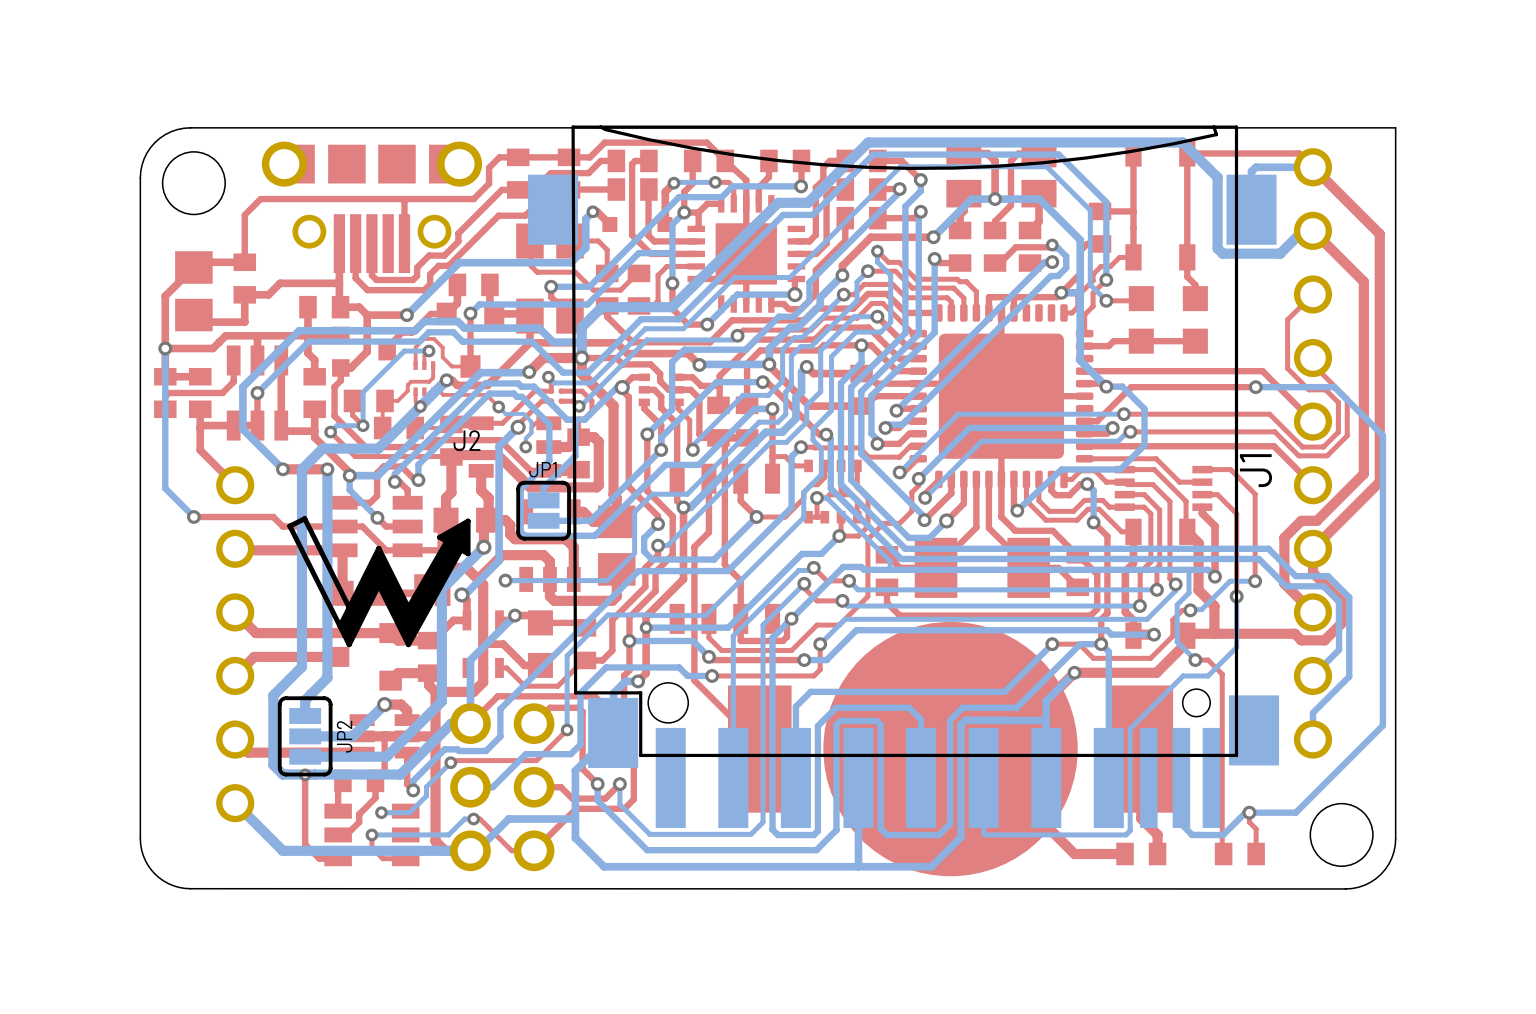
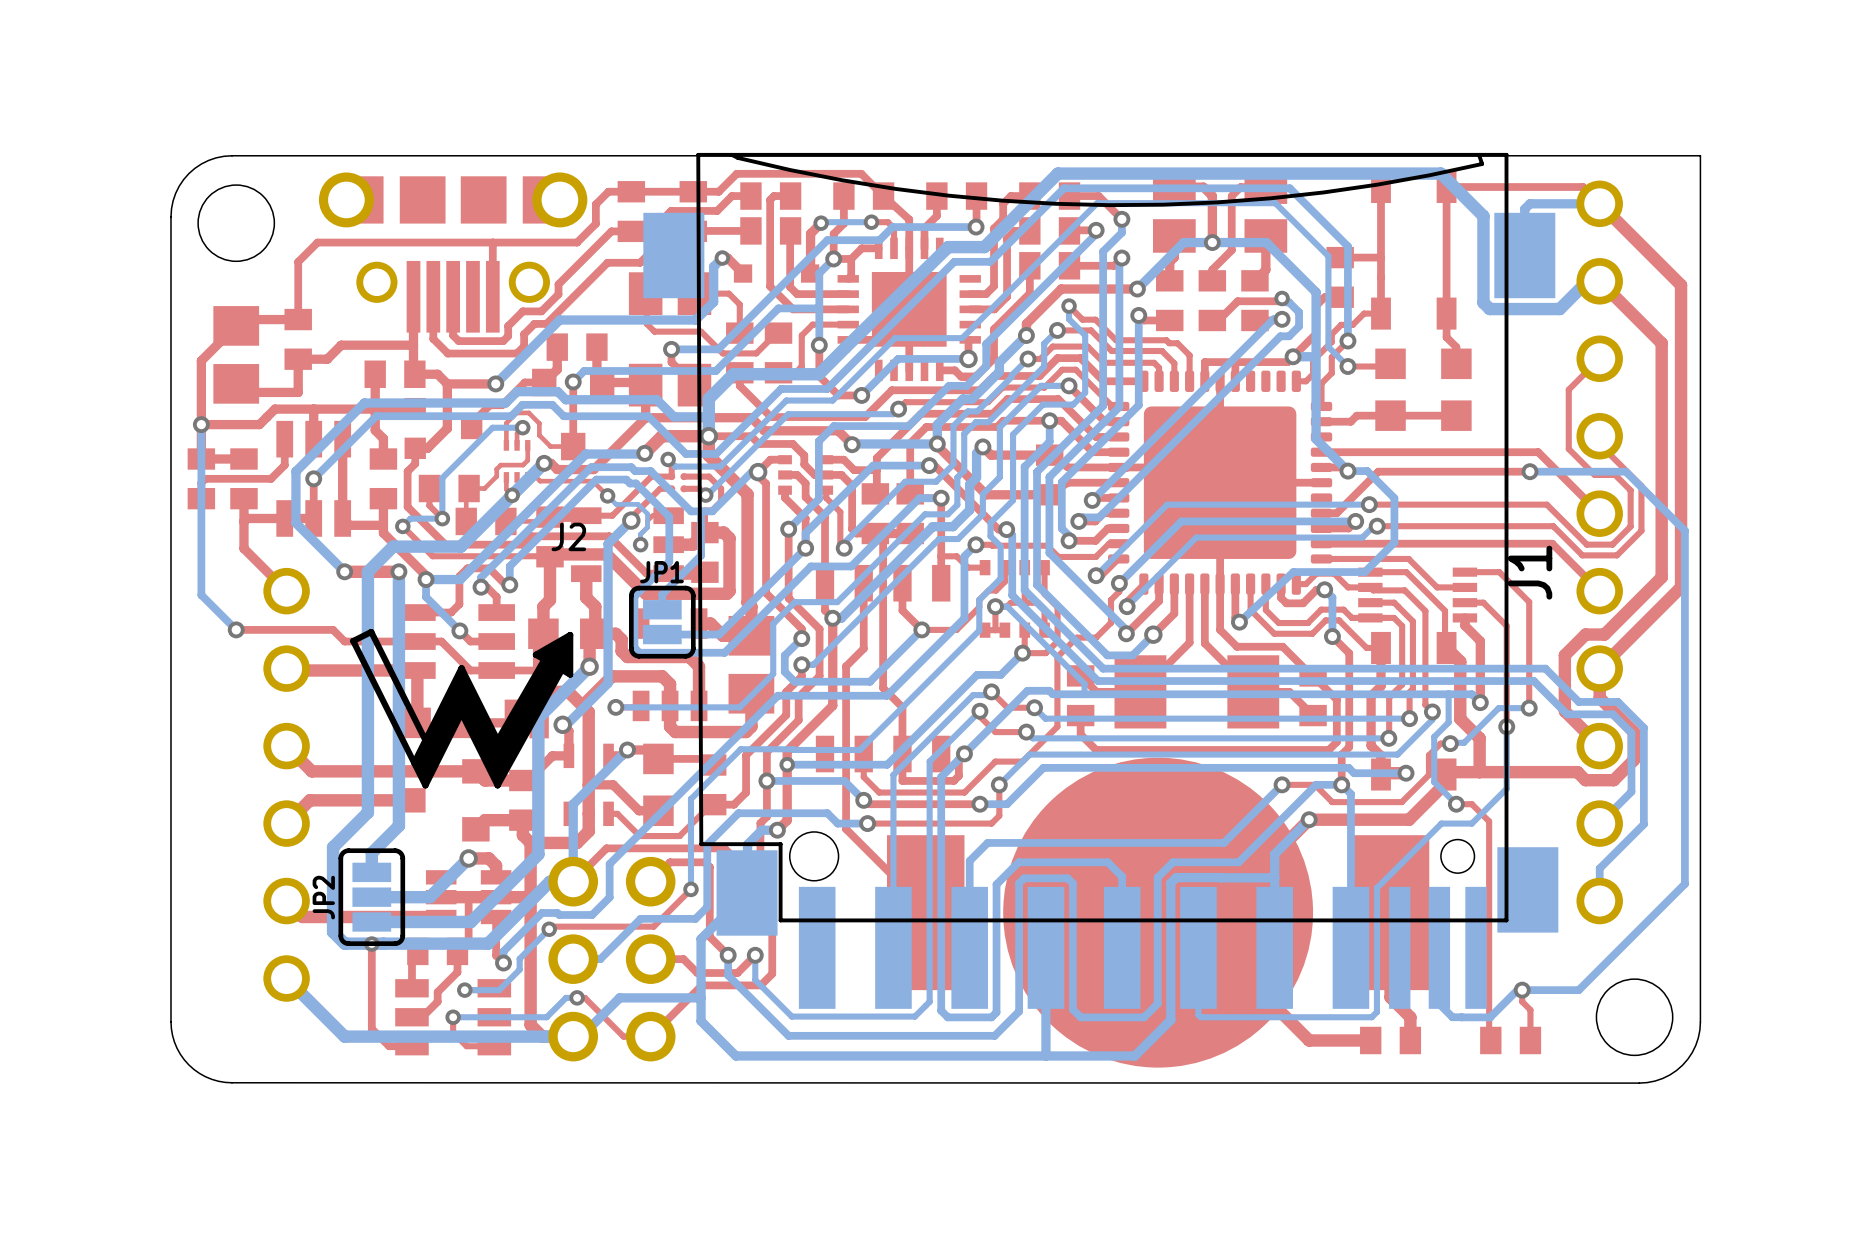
JP2 name position: JP2 (344, 736) -> JP2 (323, 897)

